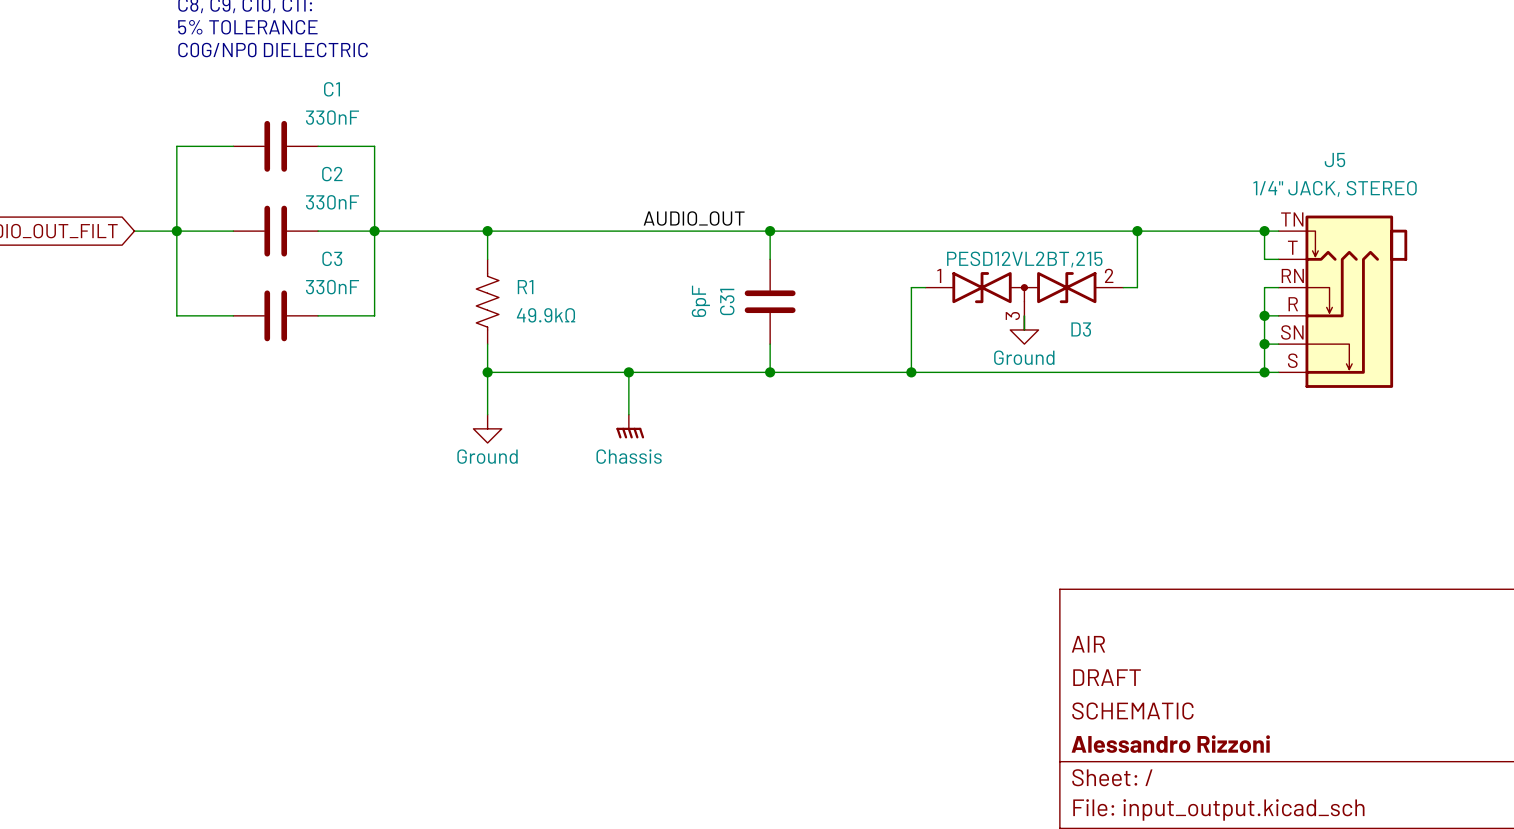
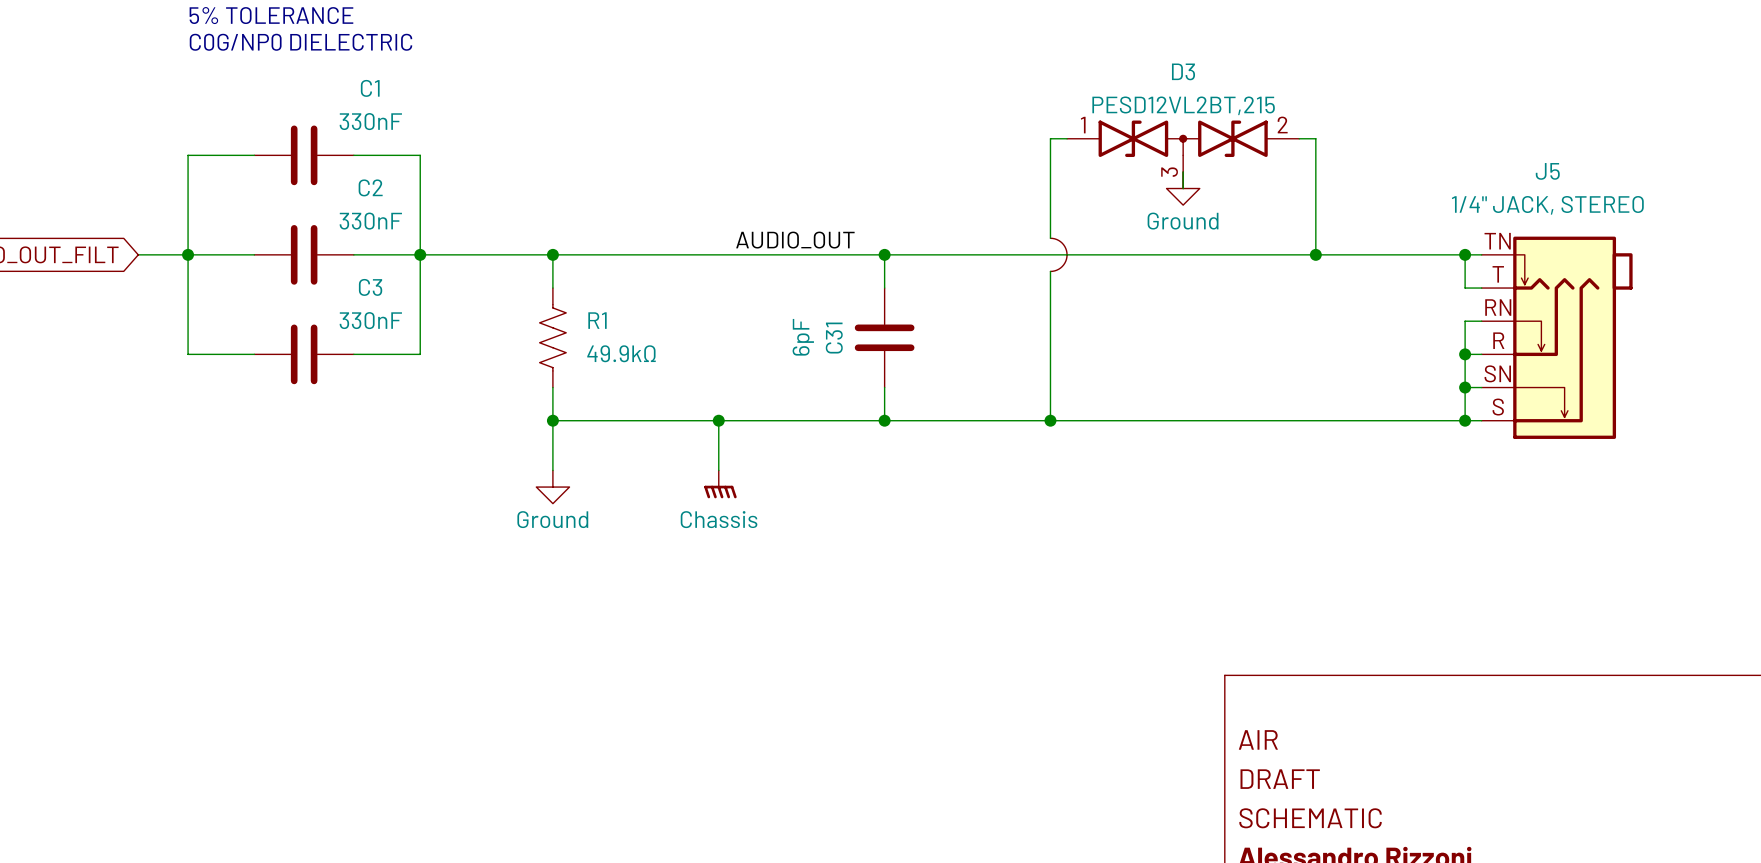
wire: none -> (1067, 138) (1050, 138) (1050, 238)
part: none -> (1058, 254)
wire: (1137, 231) (1137, 287) (1123, 287) -> (1315, 254) (1315, 138) (1299, 138)
wire: (911, 287) (925, 287) -> (1050, 321) (1050, 271)
D3 position: (1024, 301) -> (1183, 154)
wire: (1024, 315) (1024, 329) -> (1183, 171) (1183, 188)
power symbol position: Ground (1024, 329) -> Ground (1183, 188)
D3 name position: D3 (1081, 329) -> D3 (1183, 71)

